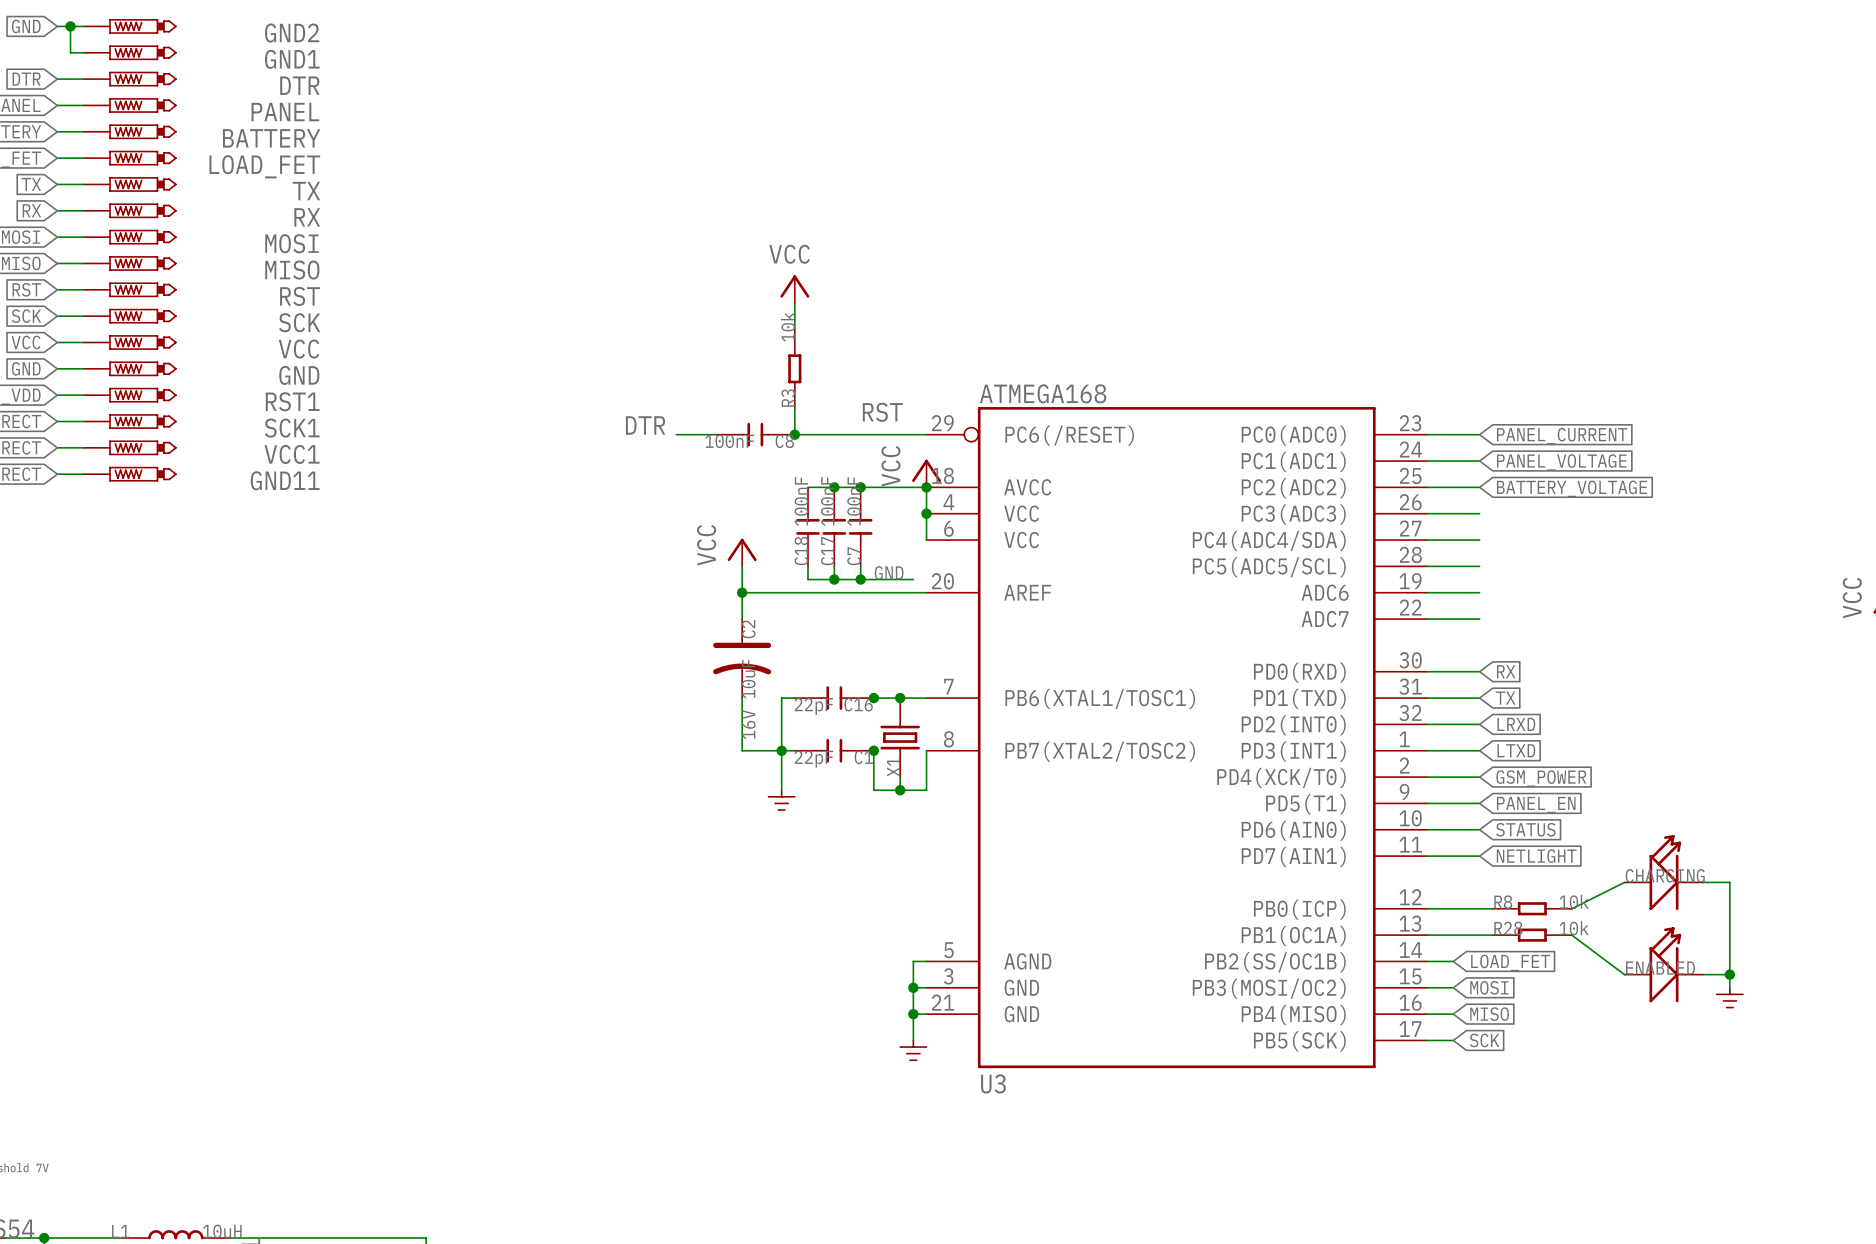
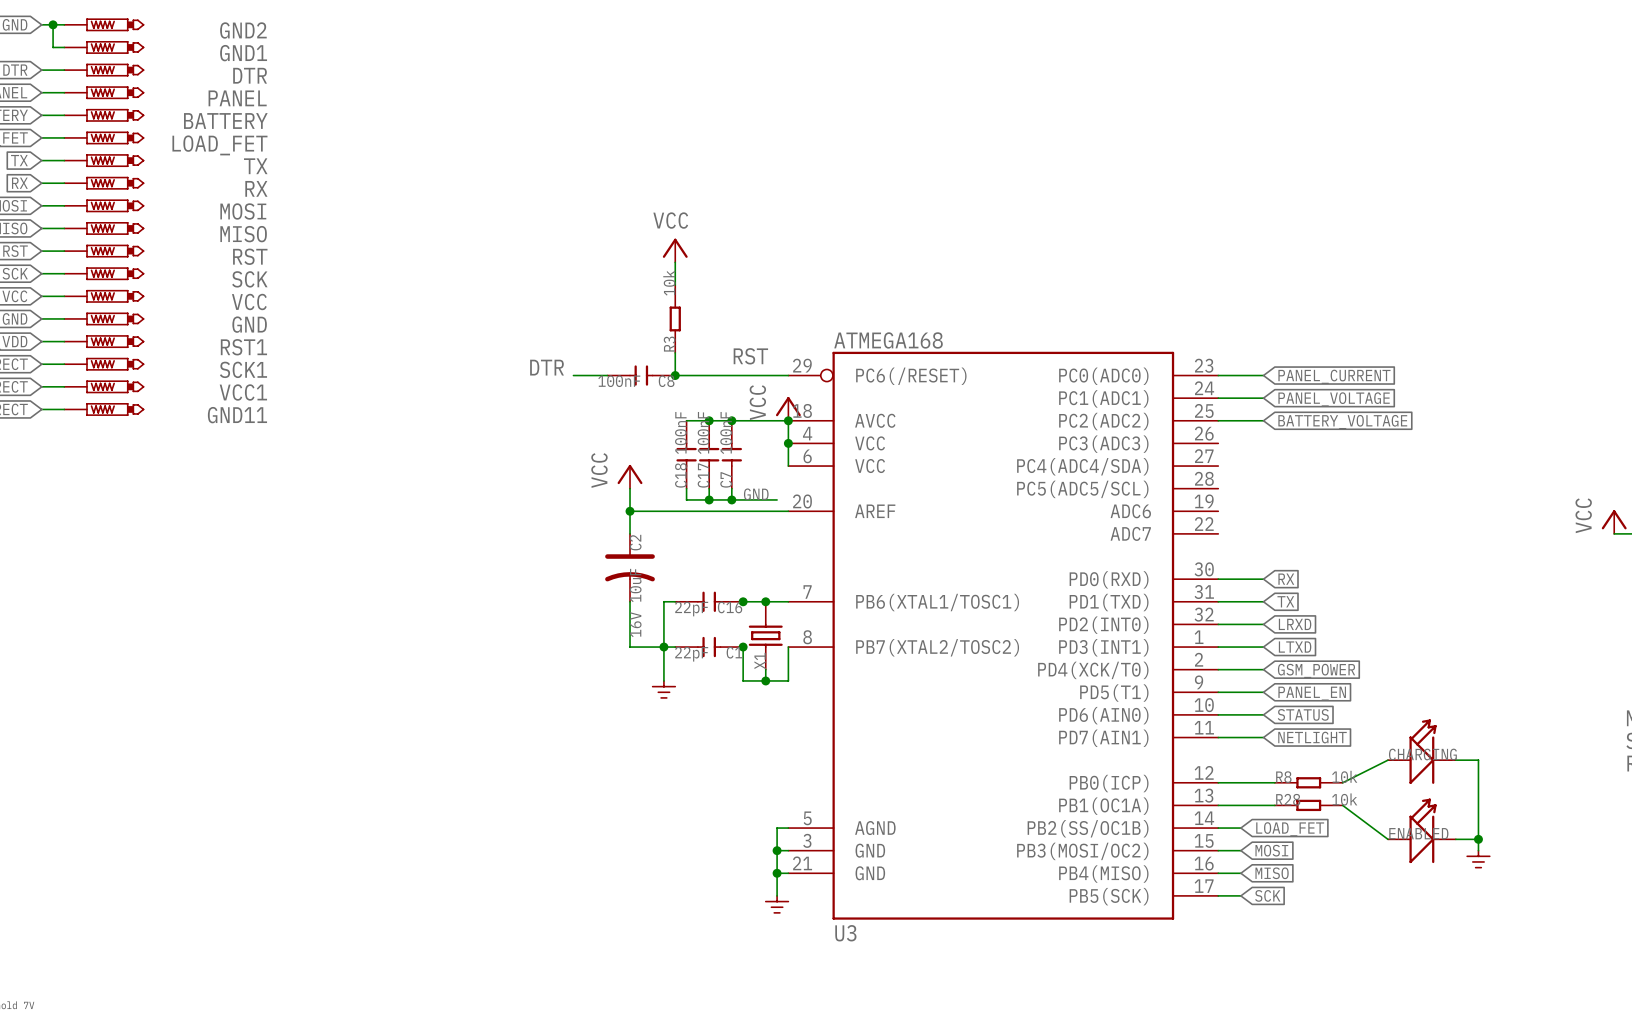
wire: (1426, 513) (1479, 513) -> none
wire: (1426, 540) (1479, 540) -> none
wire: (1426, 566) (1479, 566) -> none
wire: (1426, 592) (1479, 592) -> none
wire: (1426, 619) (1479, 619) -> none

